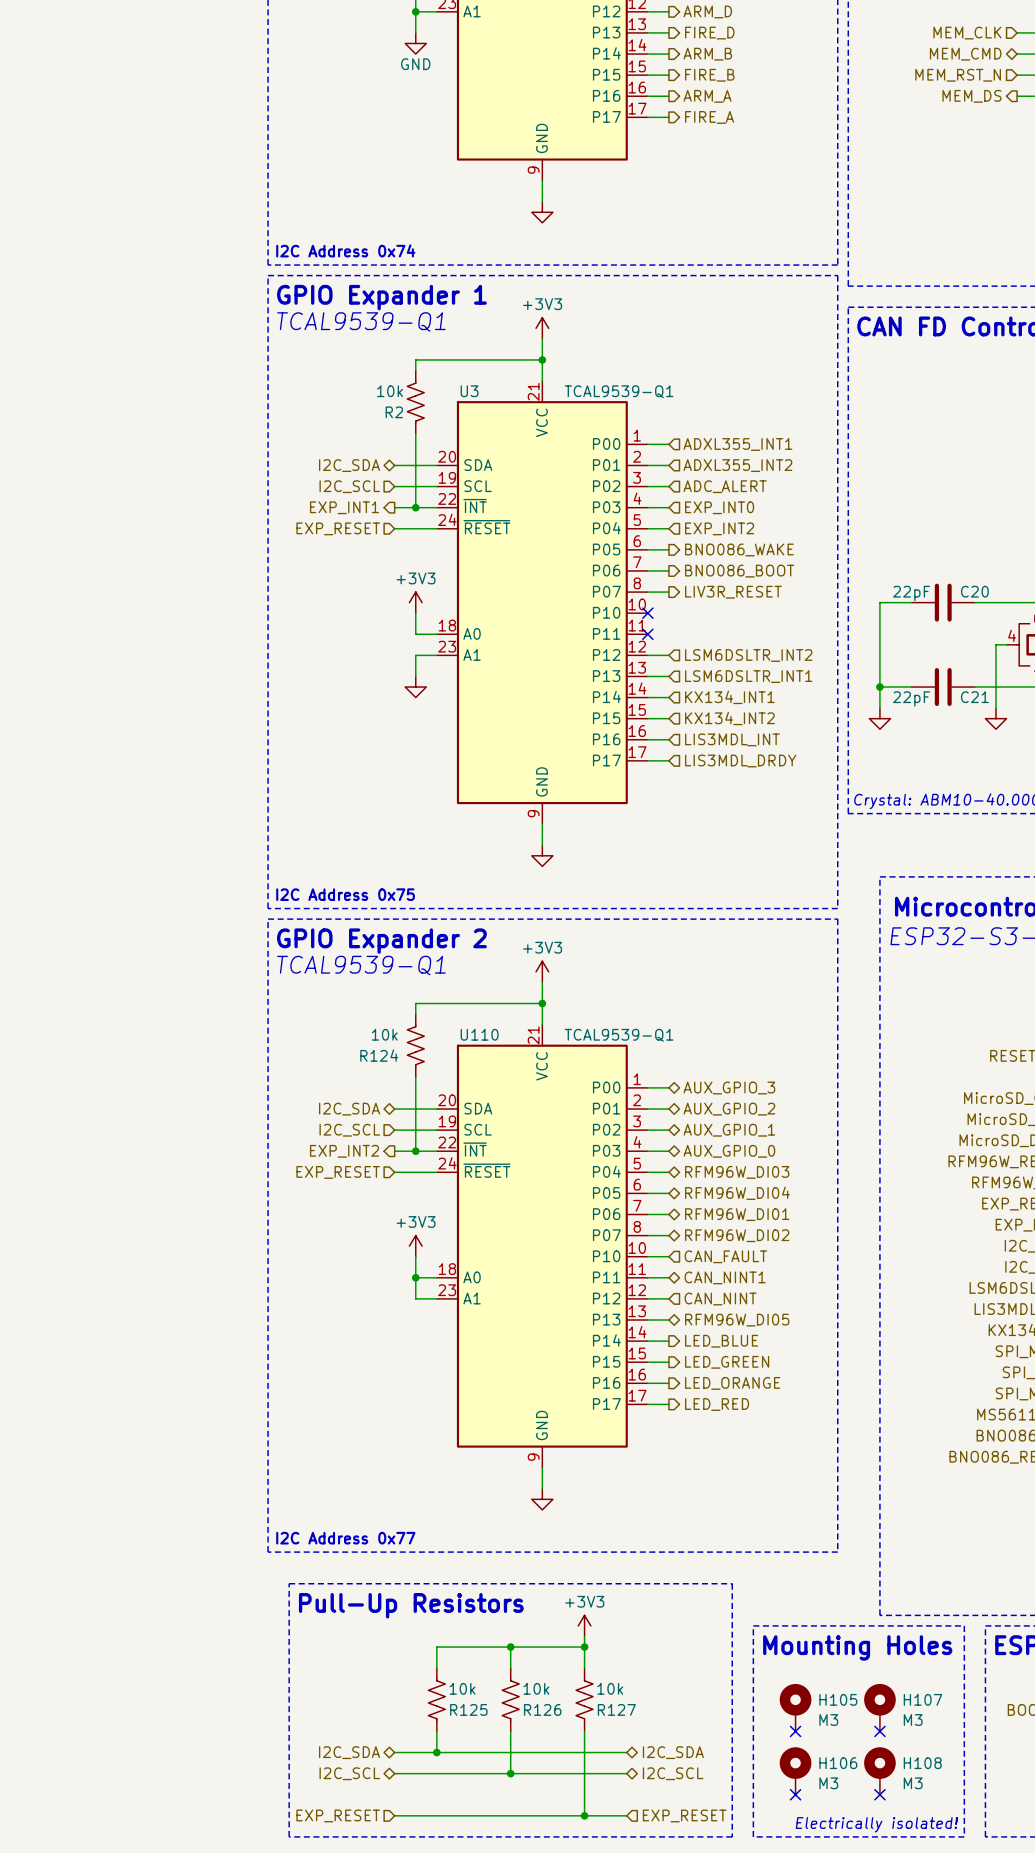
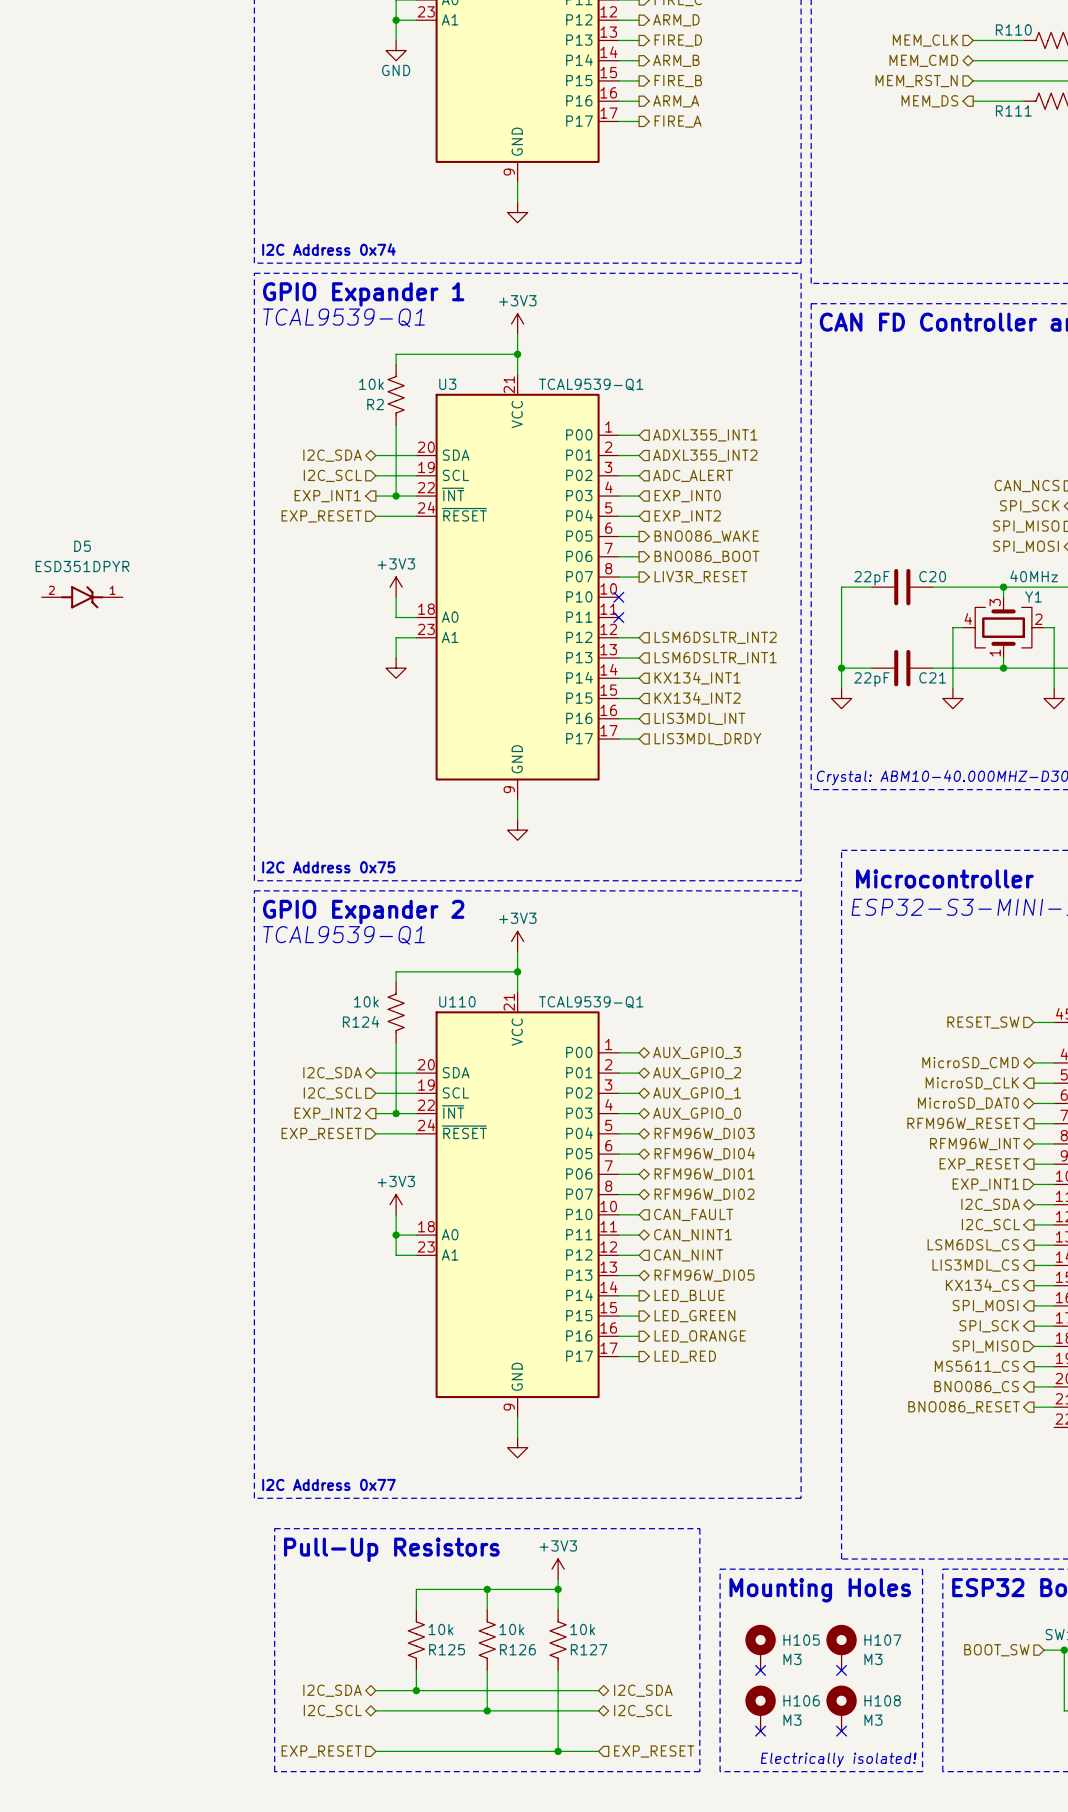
D5: none -> ESD351DPYR (82, 597)

